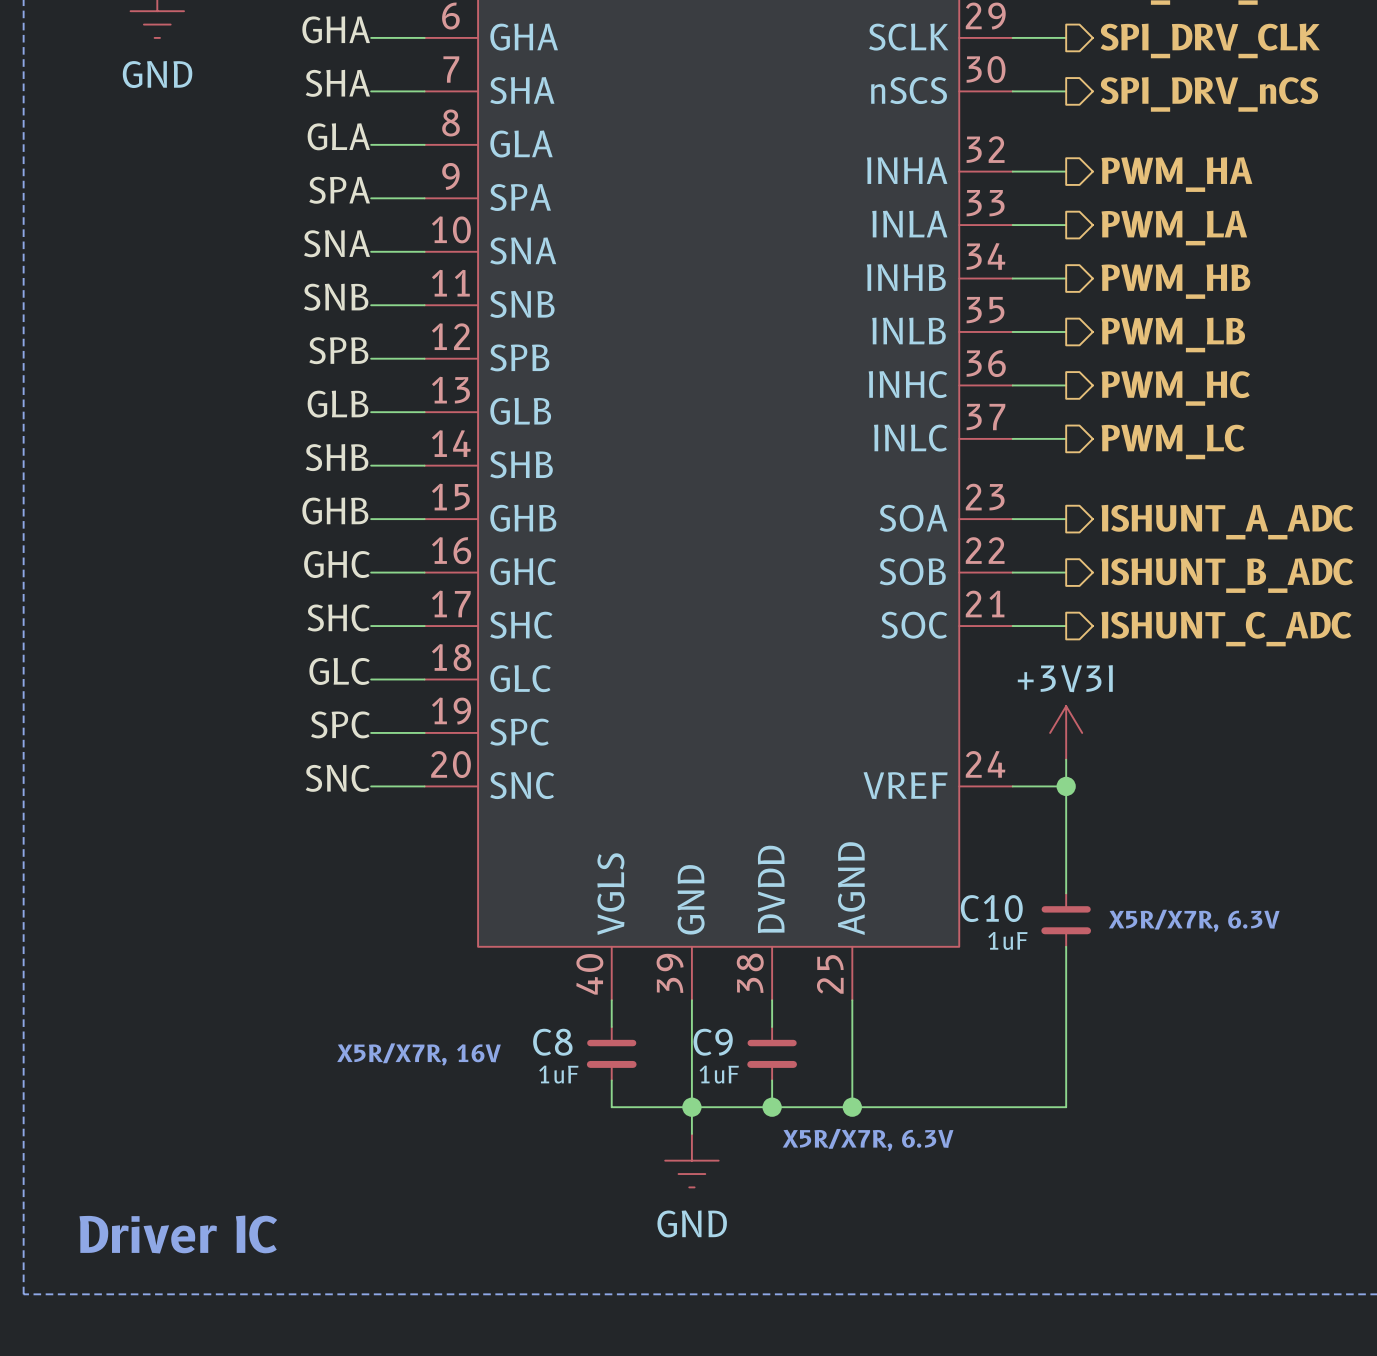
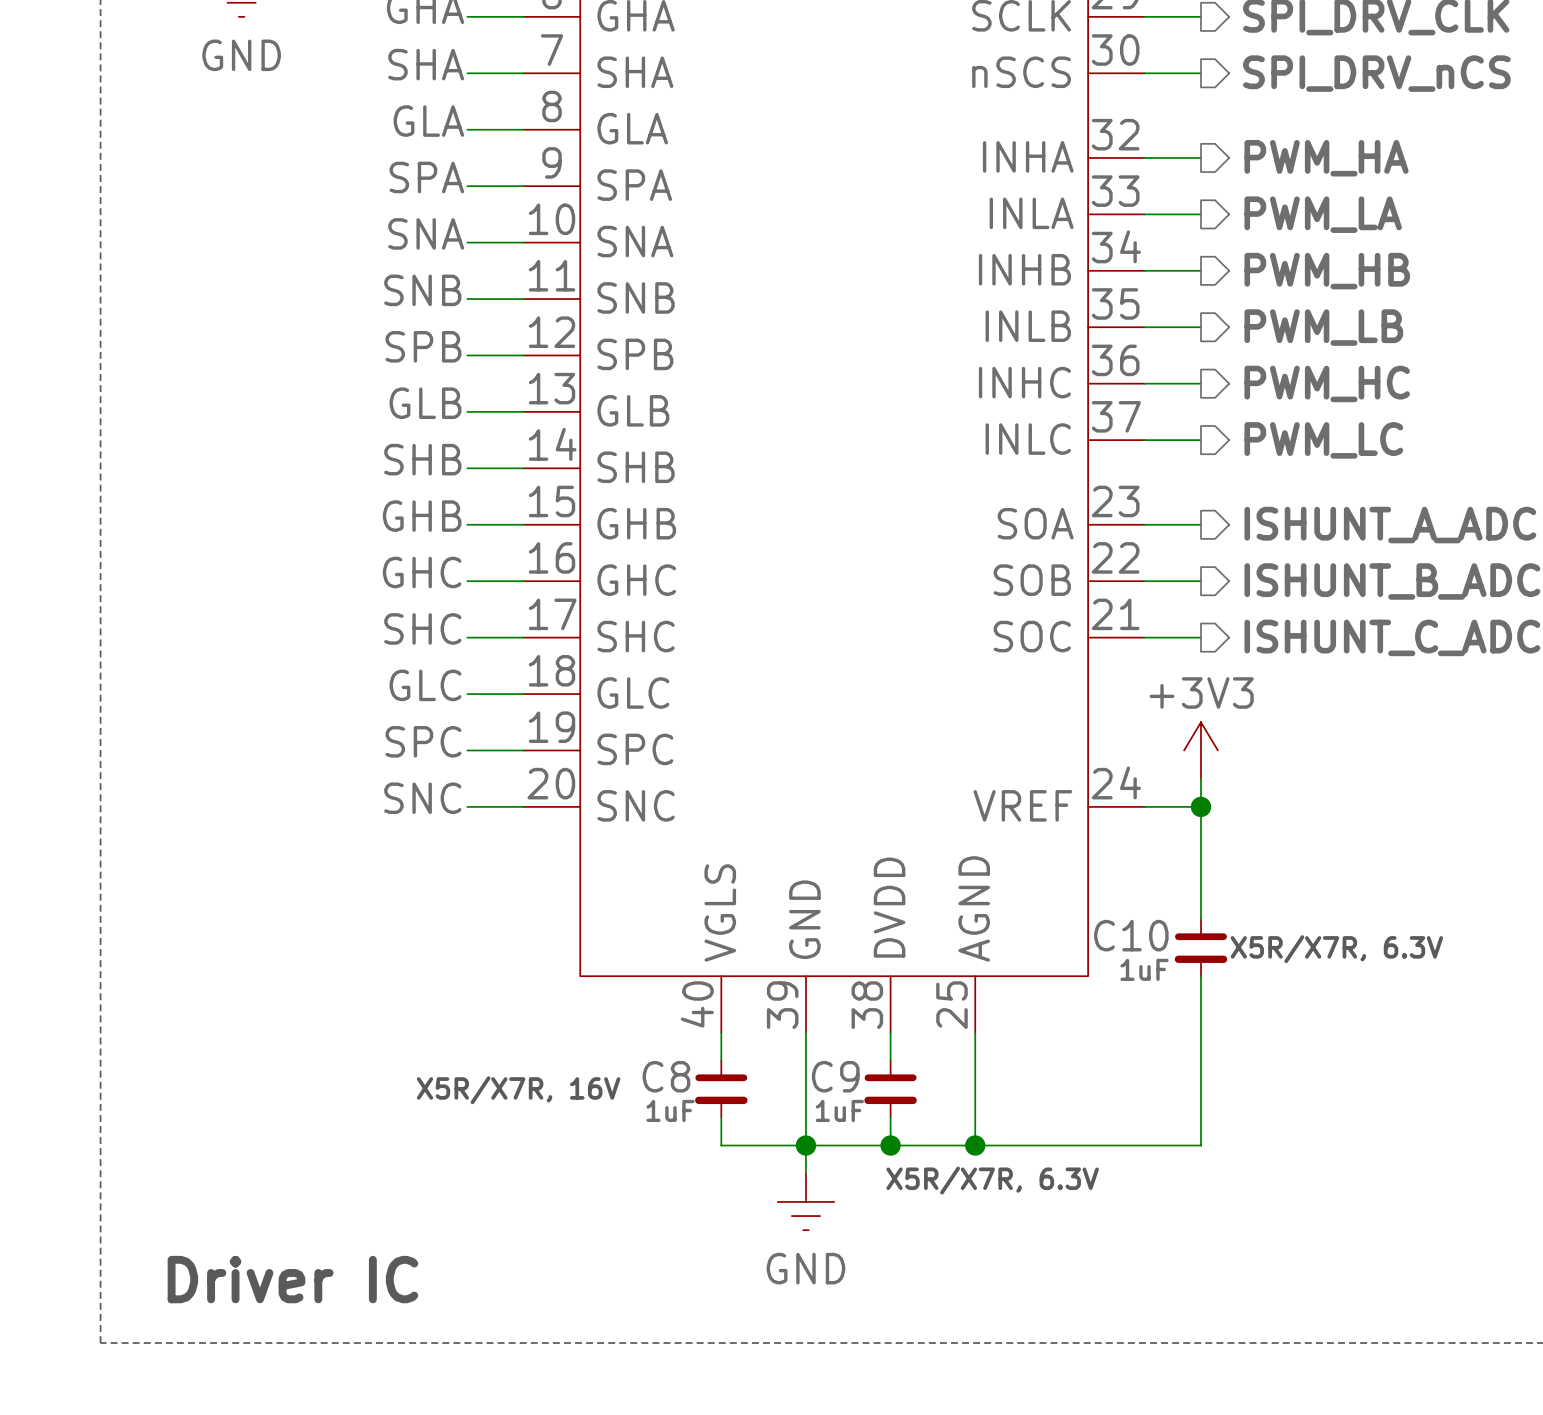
power symbol: +3V3I (1066, 732) -> +3V3 (1200, 750)

